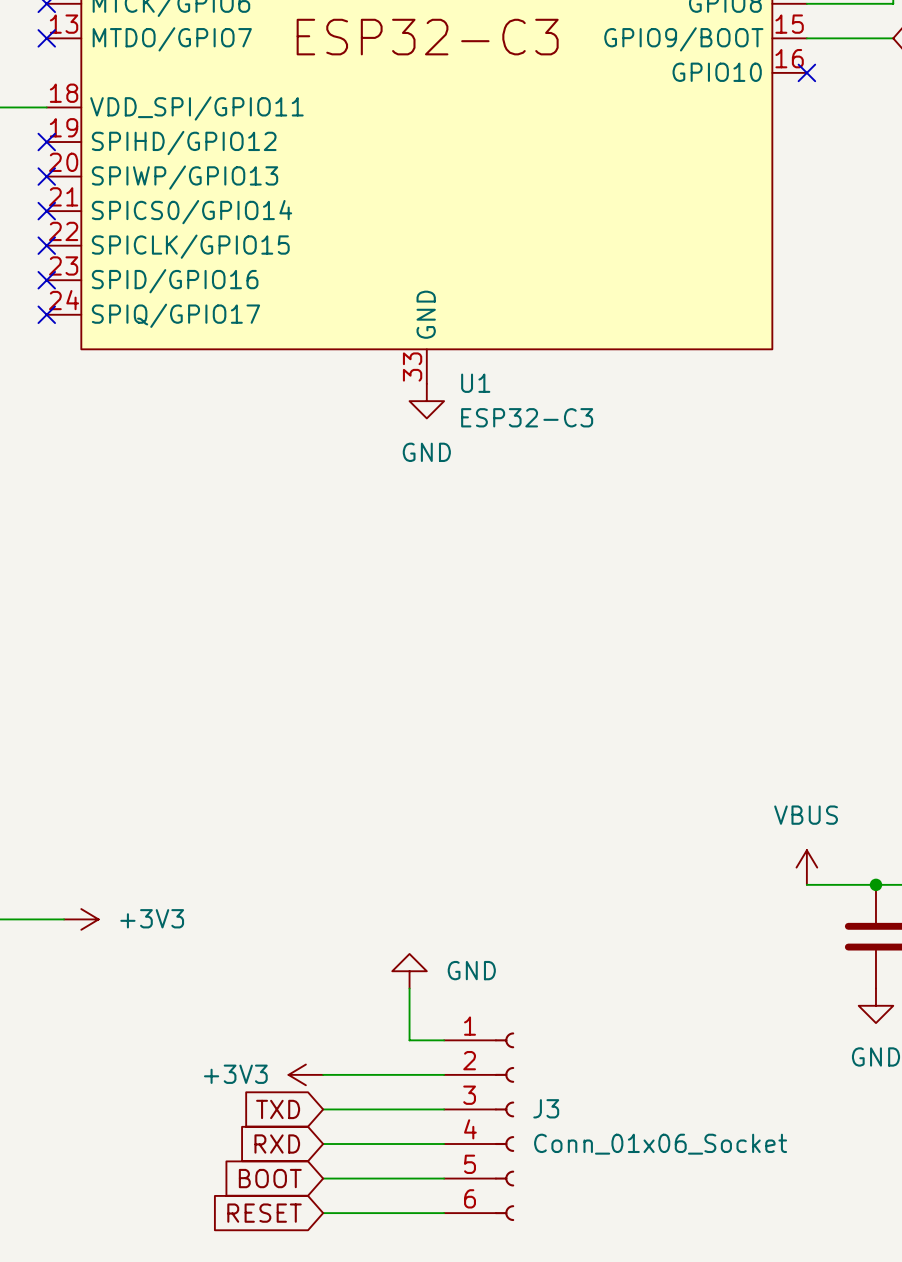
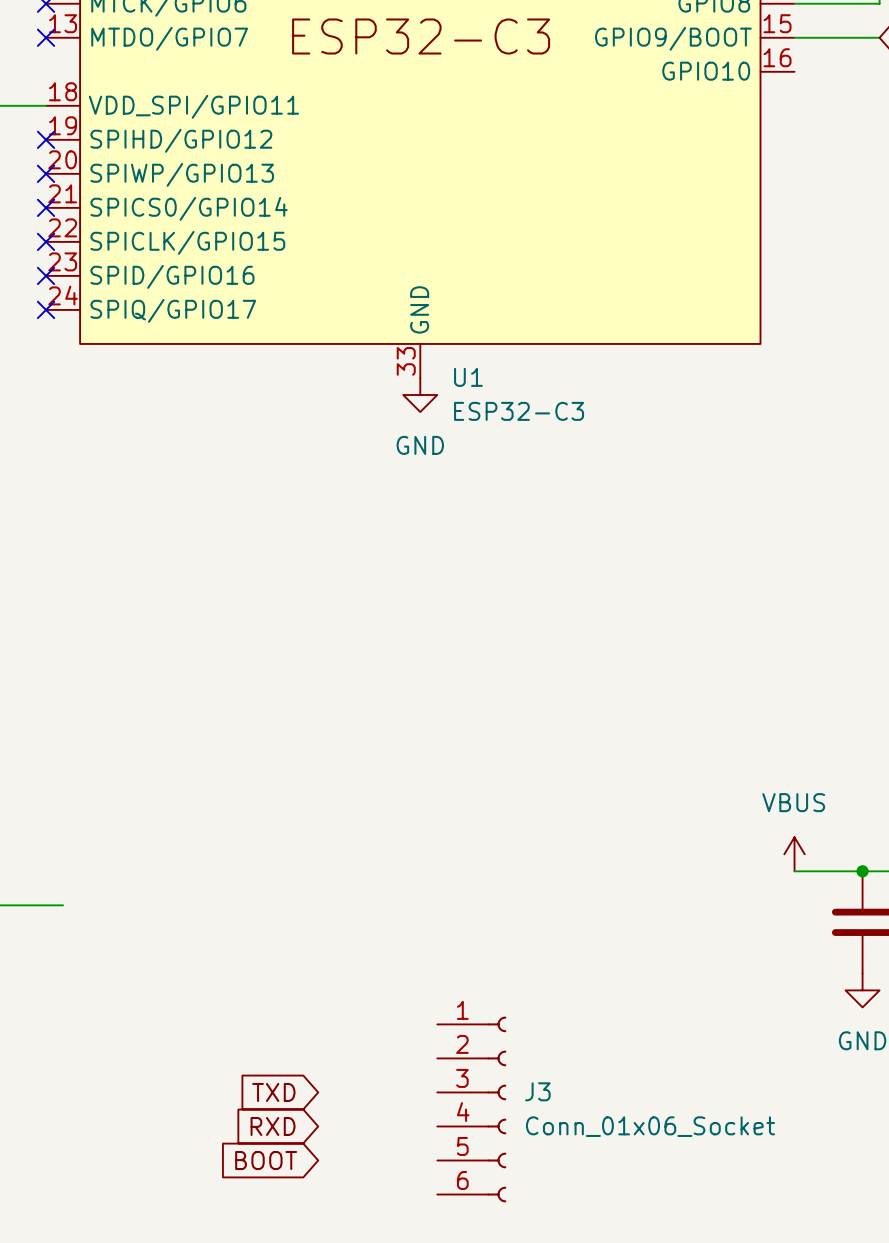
no-connect mark: (806, 72) -> none
power symbol: +3V3 (81, 919) -> none
power symbol: GND (409, 971) -> none
wire: (409, 988) (409, 1040) (444, 1040) -> none
power symbol: +3V3 (305, 1074) -> none
wire: (323, 1074) (444, 1074) -> none
wire: (323, 1109) (444, 1109) -> none
wire: (323, 1144) (444, 1144) -> none
wire: (323, 1178) (444, 1178) -> none
global label: RESET (264, 1213) -> none
wire: (323, 1213) (444, 1213) -> none

